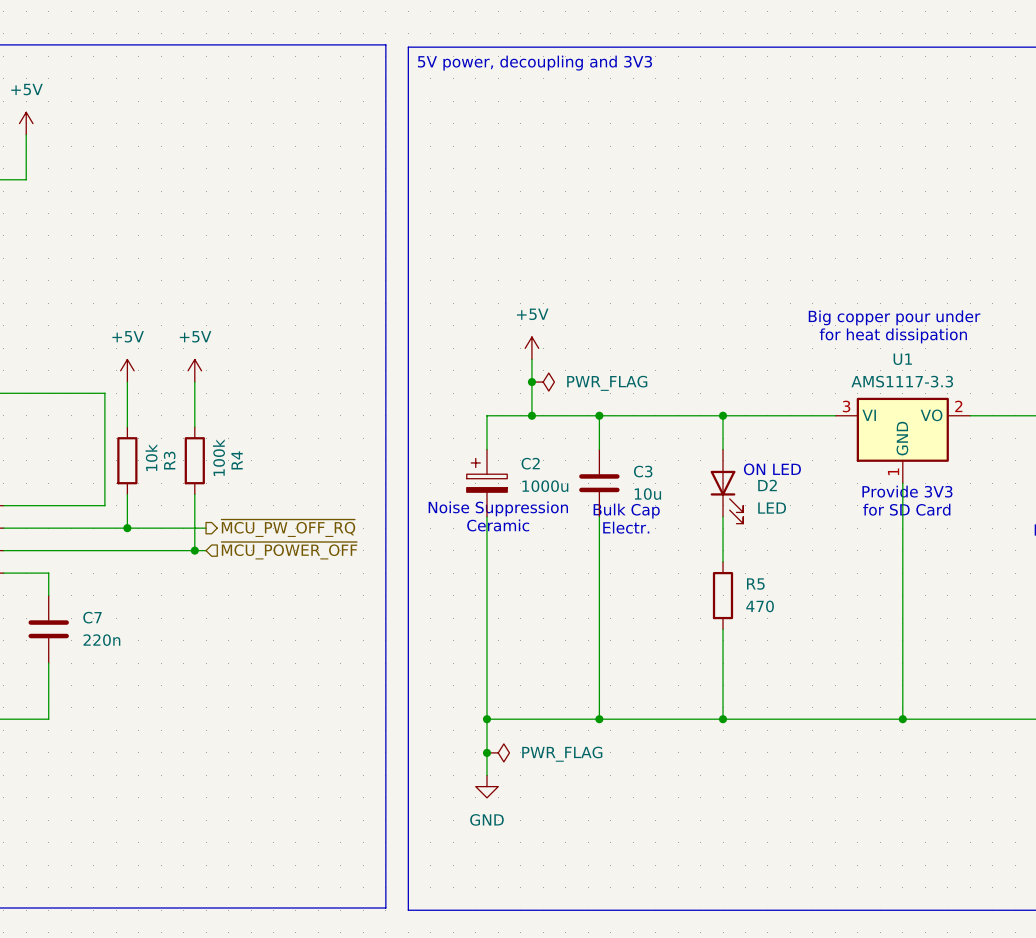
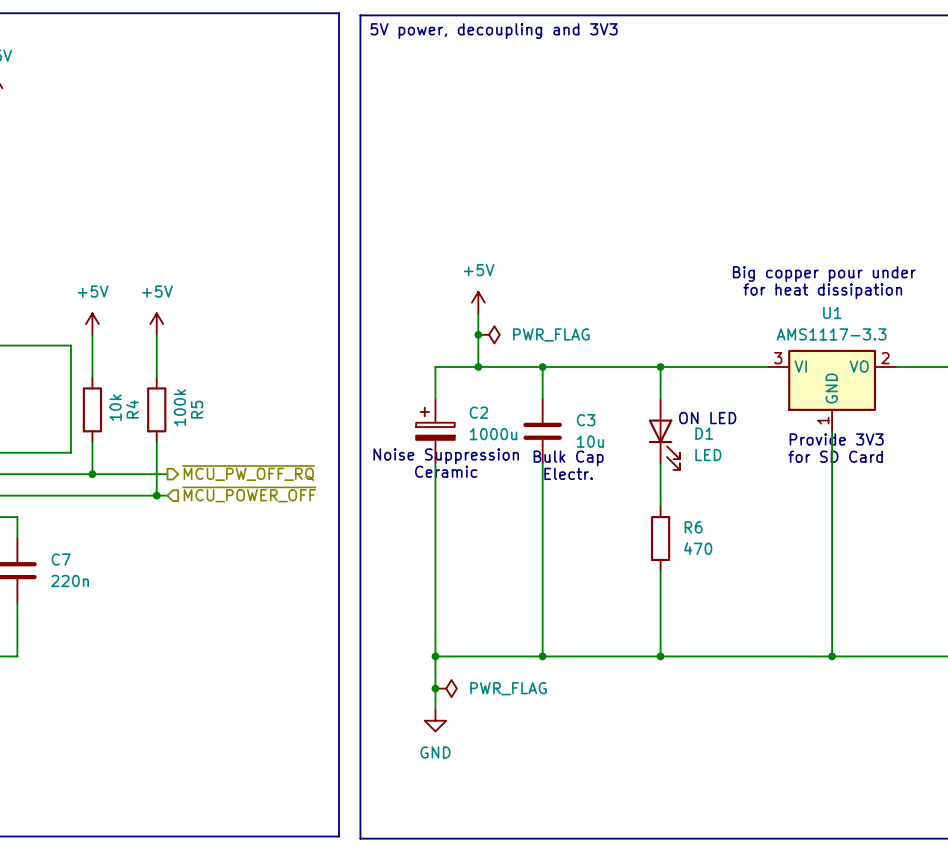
R3 name: R3 (169, 460) -> R4 (132, 409)
R4 name: R4 (237, 460) -> R5 (197, 409)
D2 name: D2 (767, 485) -> D1 (704, 433)
R5 name: R5 (755, 584) -> R6 (693, 527)

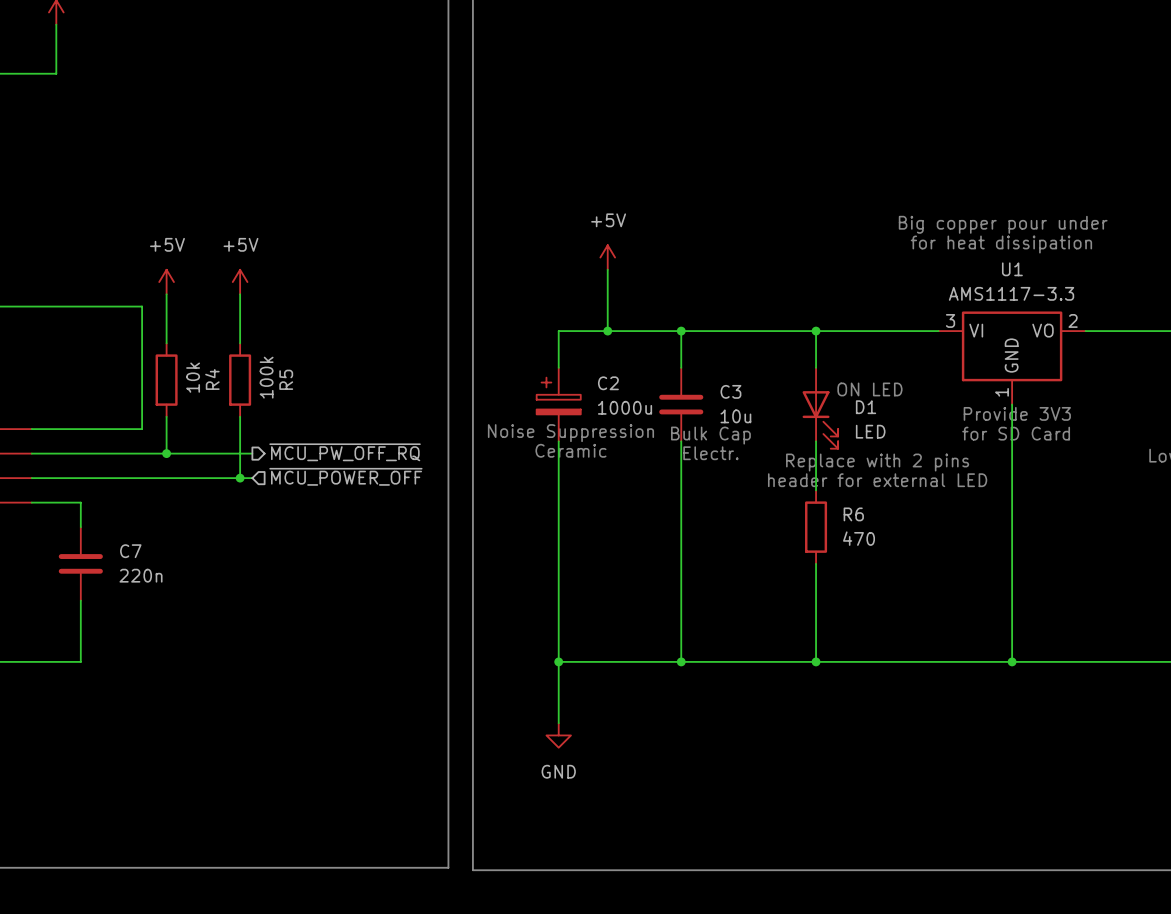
junction: (478, 334) -> none
power symbol: PWR_FLAG (489, 334) -> none
text: none -> Replace with 2 pins (877, 462)
text: none -> header for external LED (877, 480)
junction: (435, 688) -> none
power symbol: PWR_FLAG (446, 688) -> none

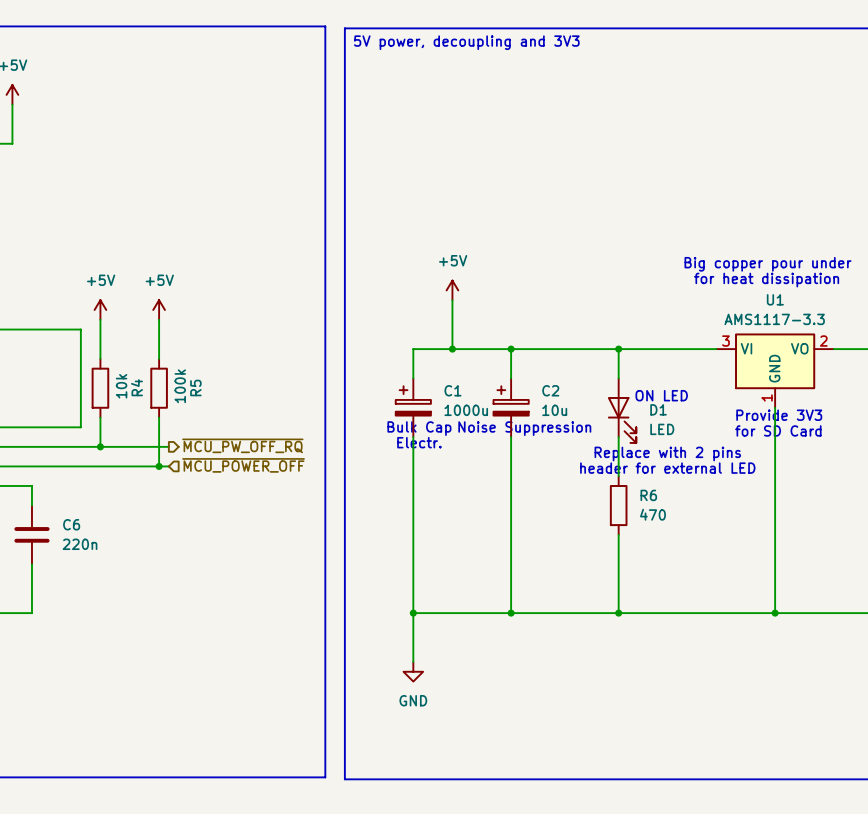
C2 name: C2 (608, 383) -> C1 (452, 390)
C3: 10u (681, 404) -> none
C2: none -> 10u (511, 407)
text: none -> Noise Suppression (524, 428)
text: Noise Suppression (570, 433) -> Bulk Cap (419, 428)
text: Bulk Cap (710, 435) -> none
text: Ceramic (570, 450) -> Electr. (419, 442)
text: Electr. (710, 453) -> none
C7 name: C7 (130, 551) -> C6 (71, 524)

